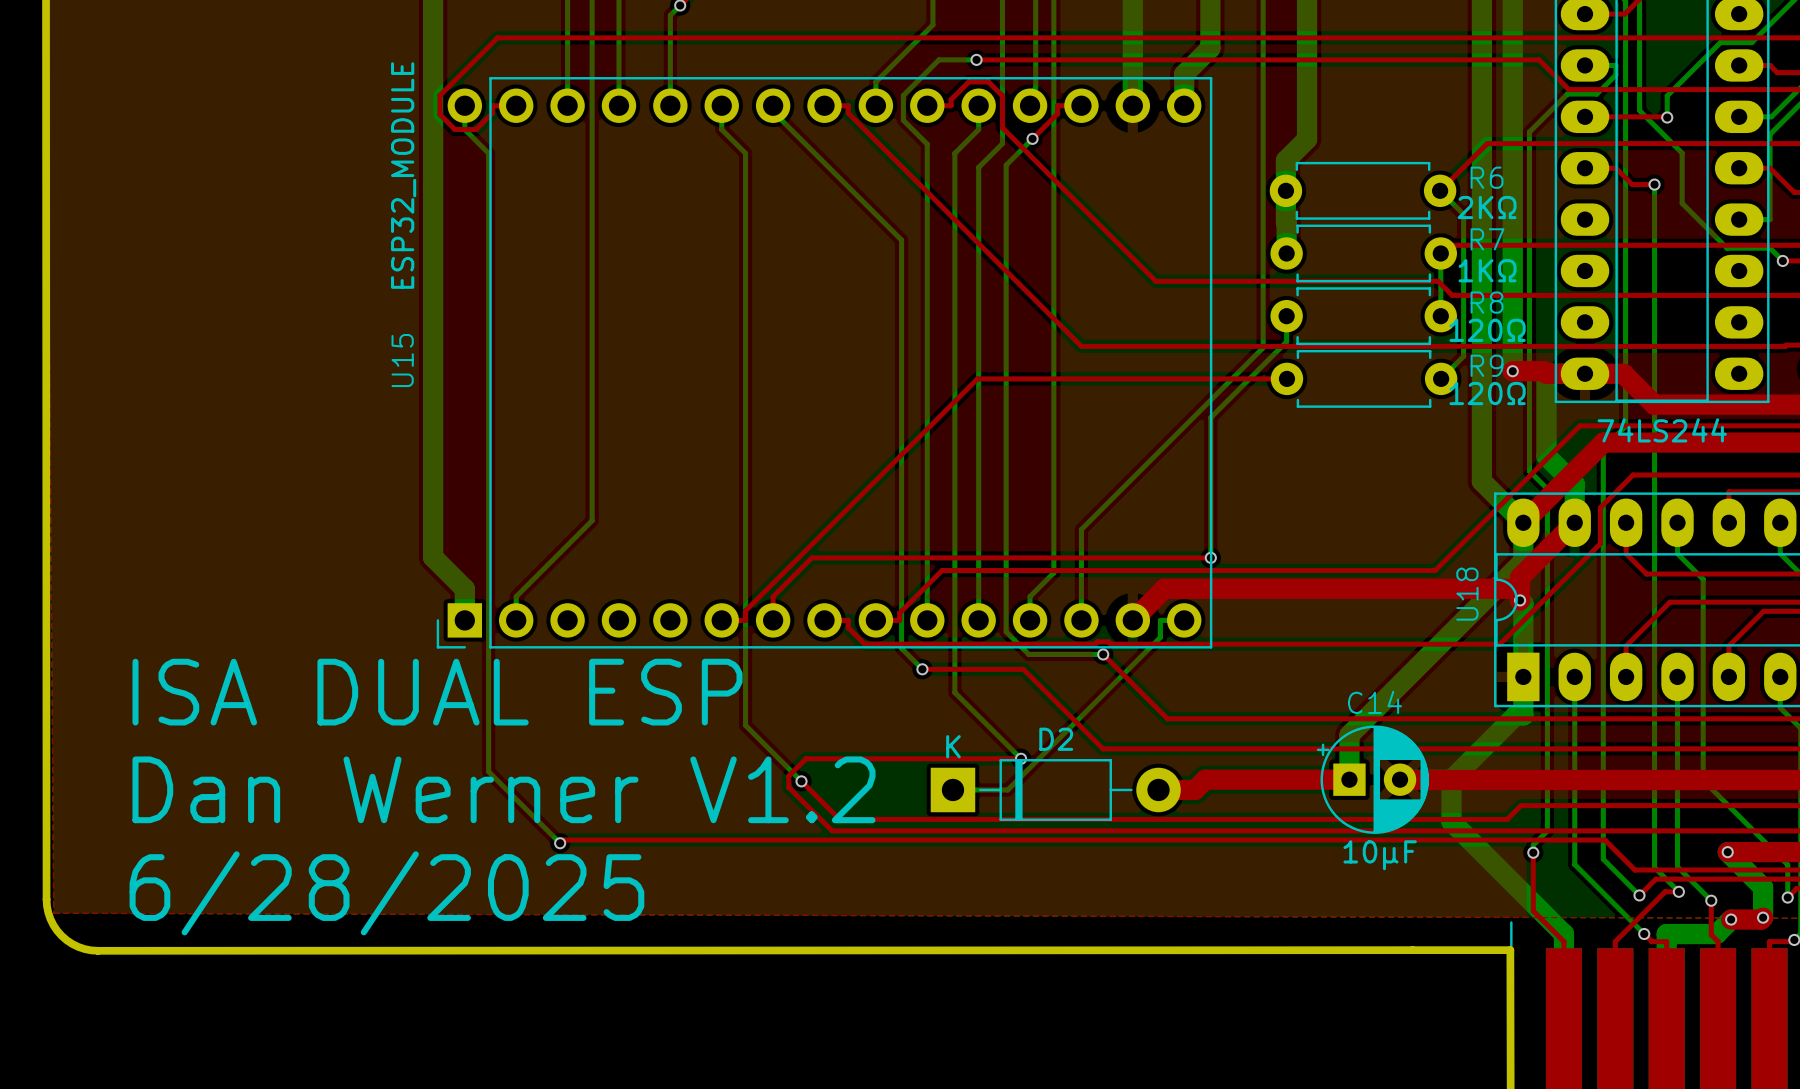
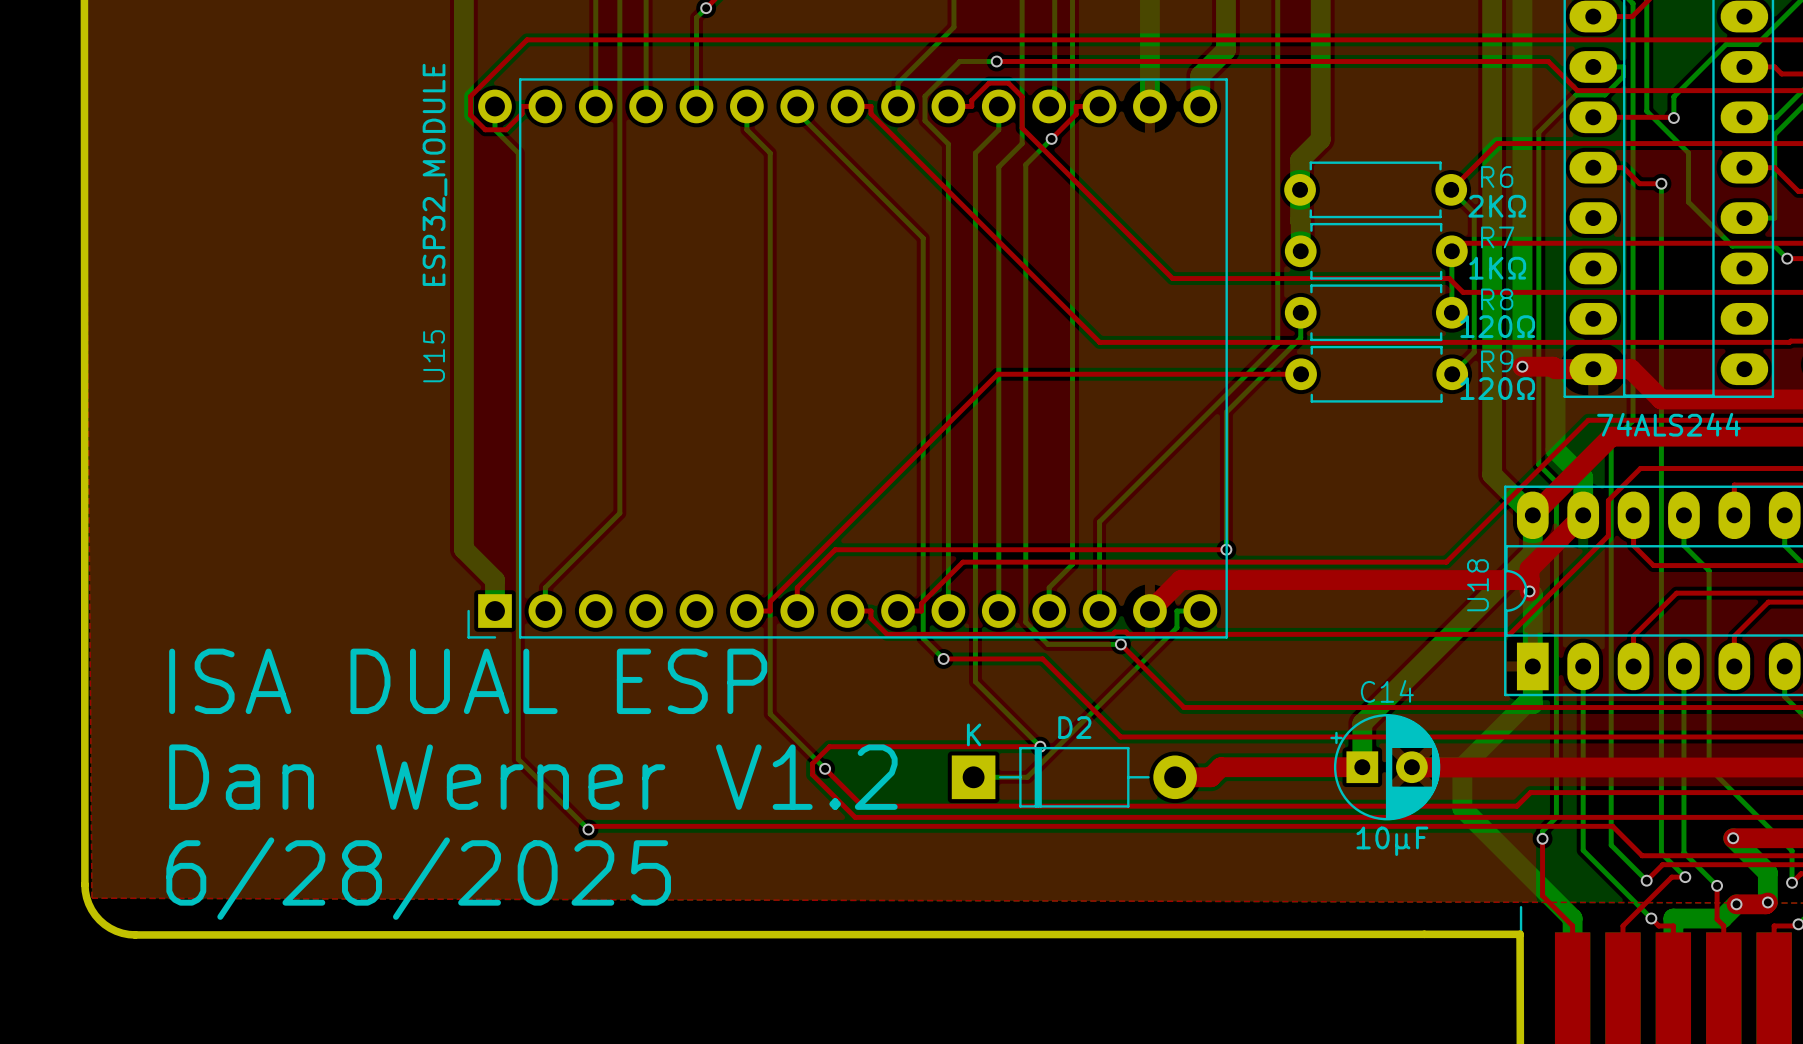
part value: 74LS244 (1662, 430) -> 74ALS244 (1668, 424)

